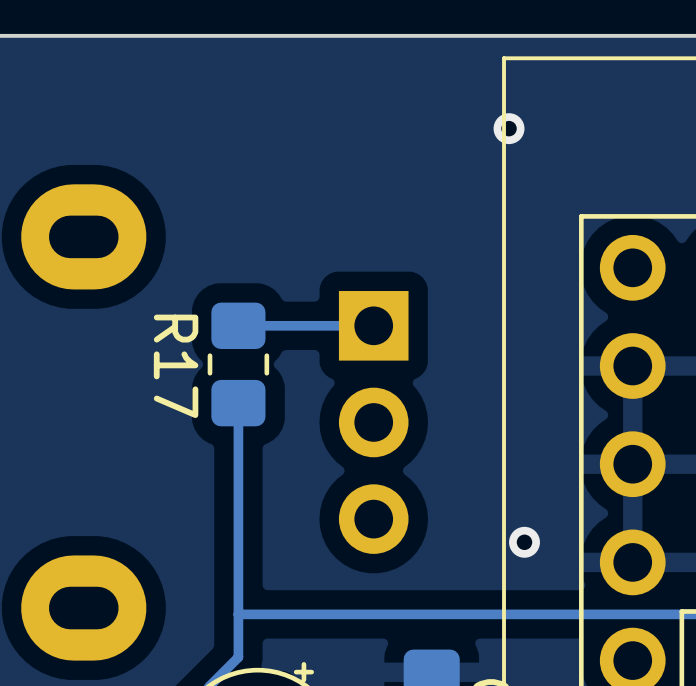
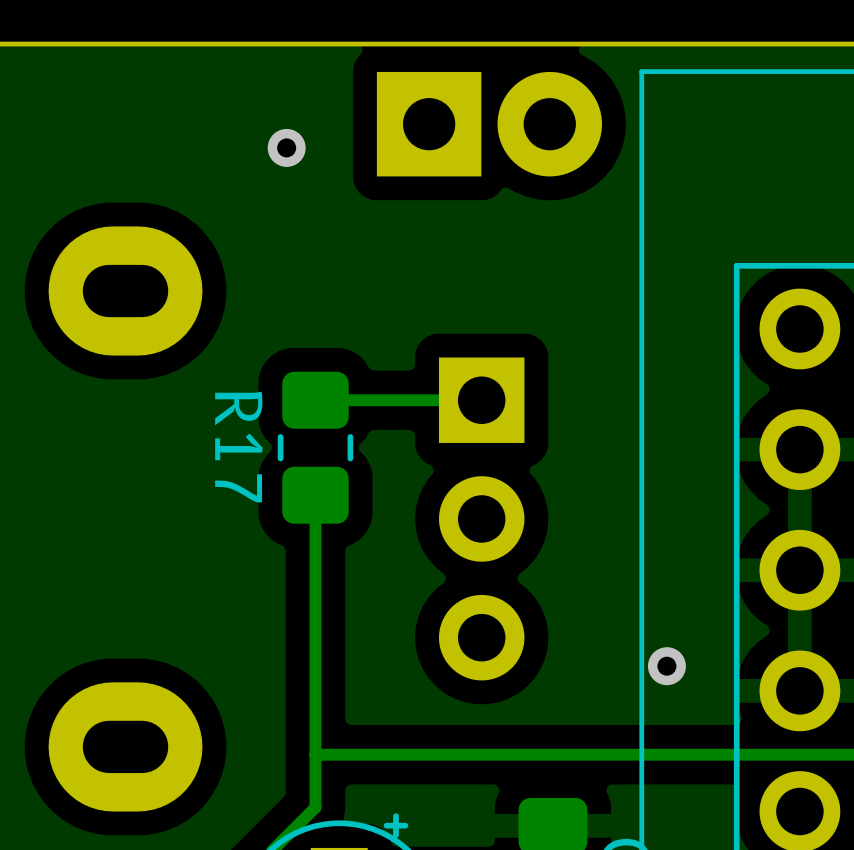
part: none -> (489, 124)
via: none -> (286, 147)
via: (509, 128) -> none

